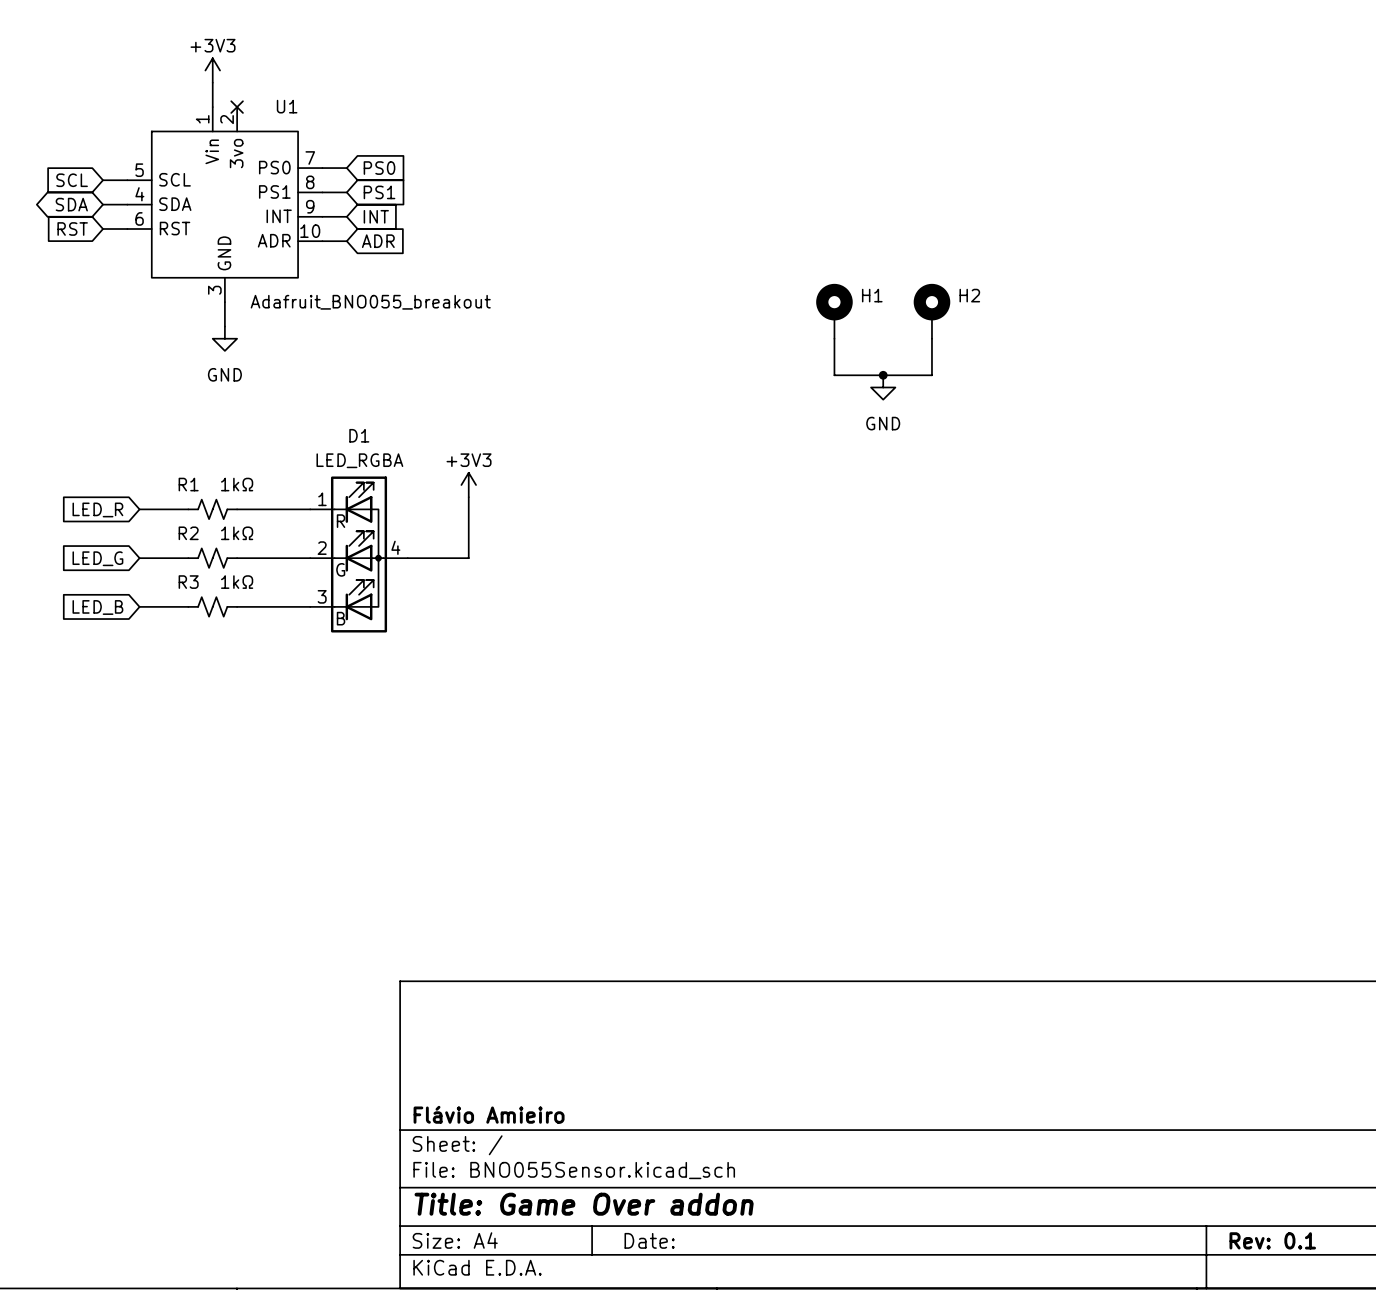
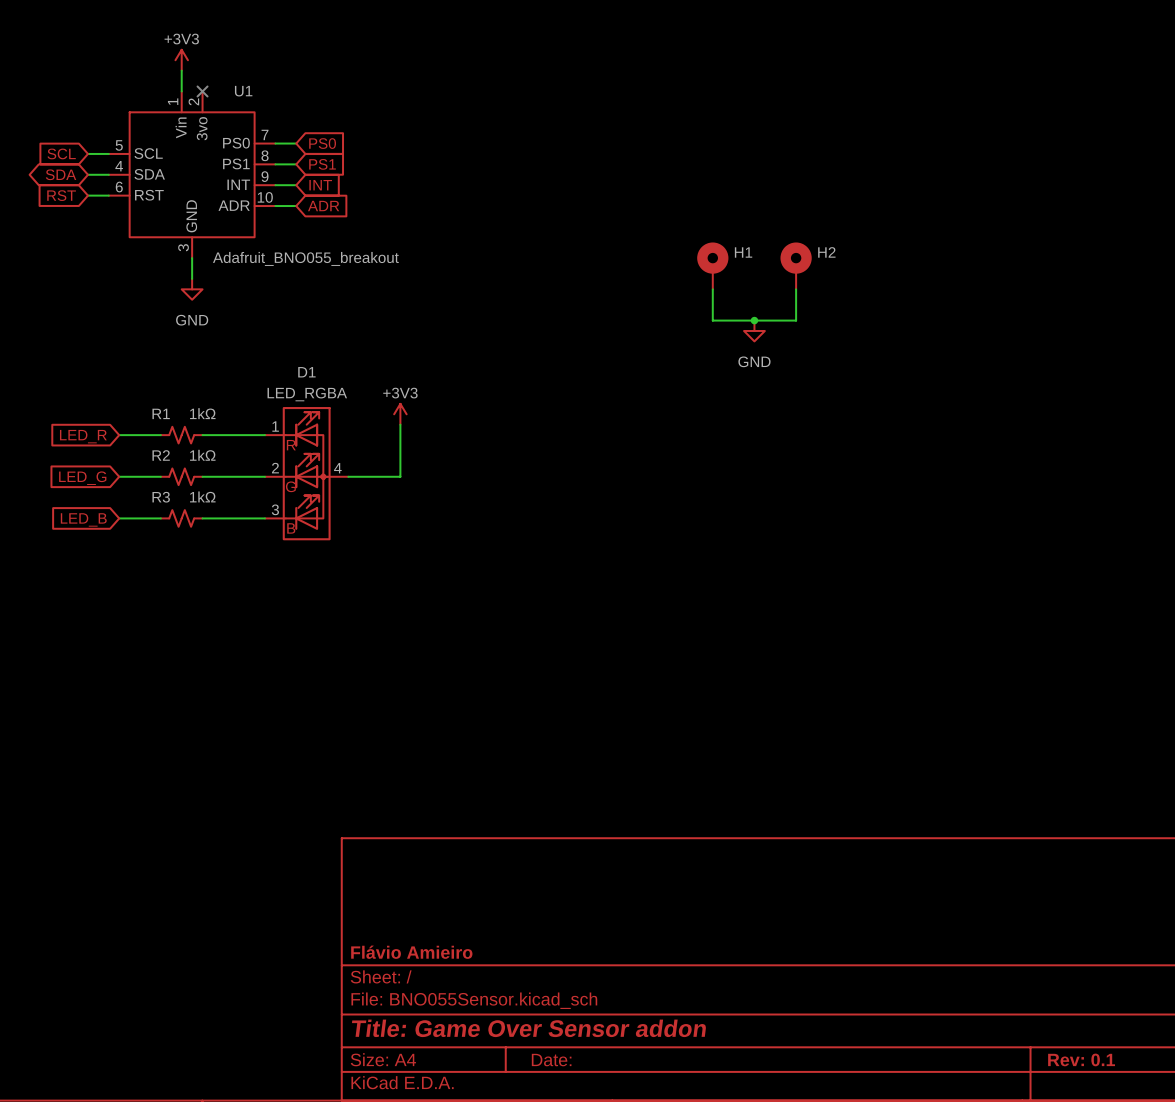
title block: Title: Game Over addon (584, 1204) -> Title: Game Over Sensor addon (529, 1028)

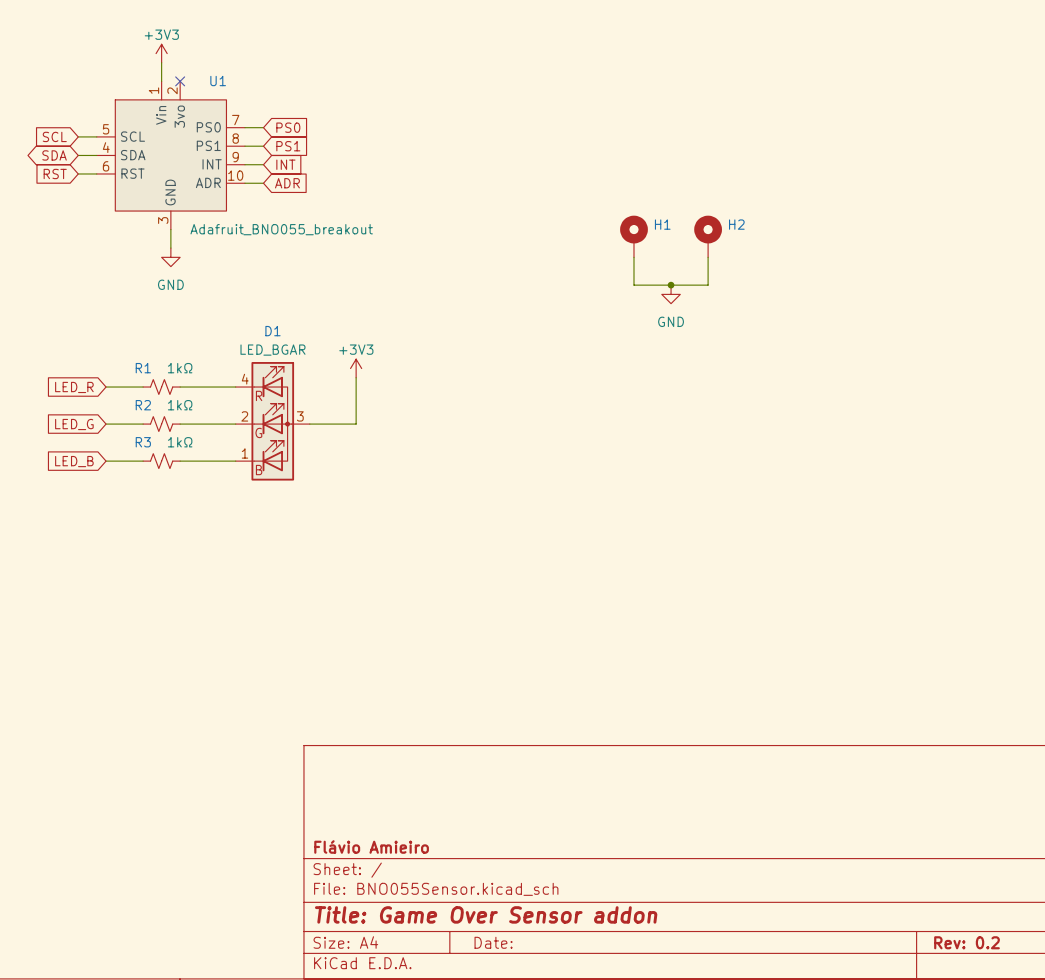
D1 value: LED_RGBA (307, 394) -> LED_BGAR (272, 350)
D1 pin number: 1 (275, 426) -> 4 (245, 379)
D1 pin number: 4 (337, 468) -> 3 (300, 416)
D1 pin number: 3 (275, 509) -> 1 (244, 453)
title block: Rev: 0.1 (1081, 1059) -> Rev: 0.2 (967, 942)

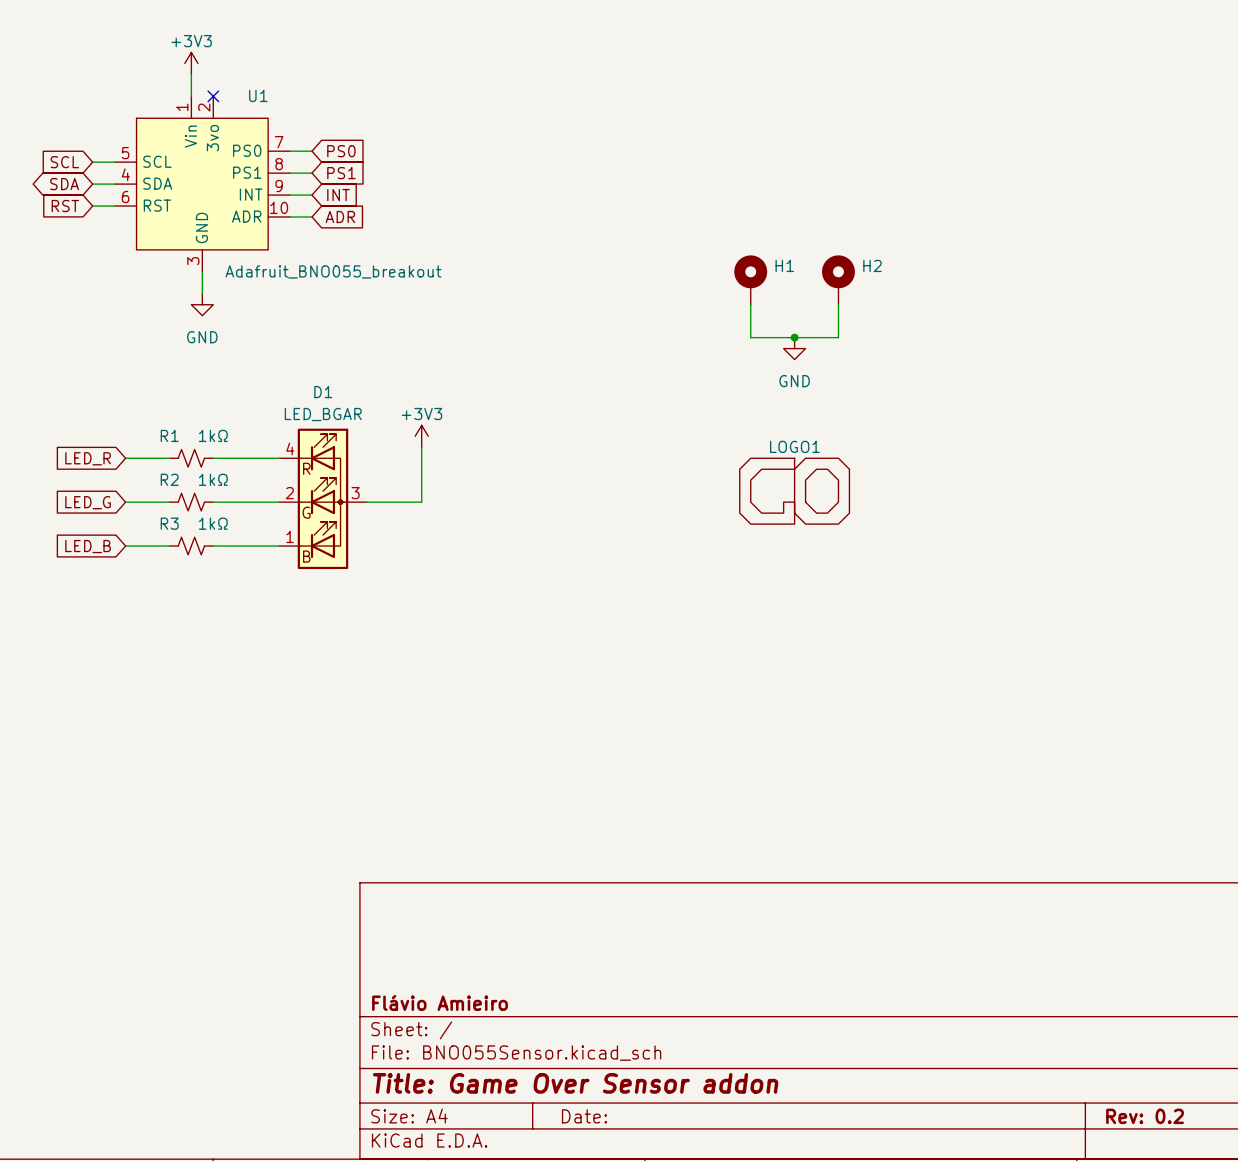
LOGO1: none -> (794, 491)

